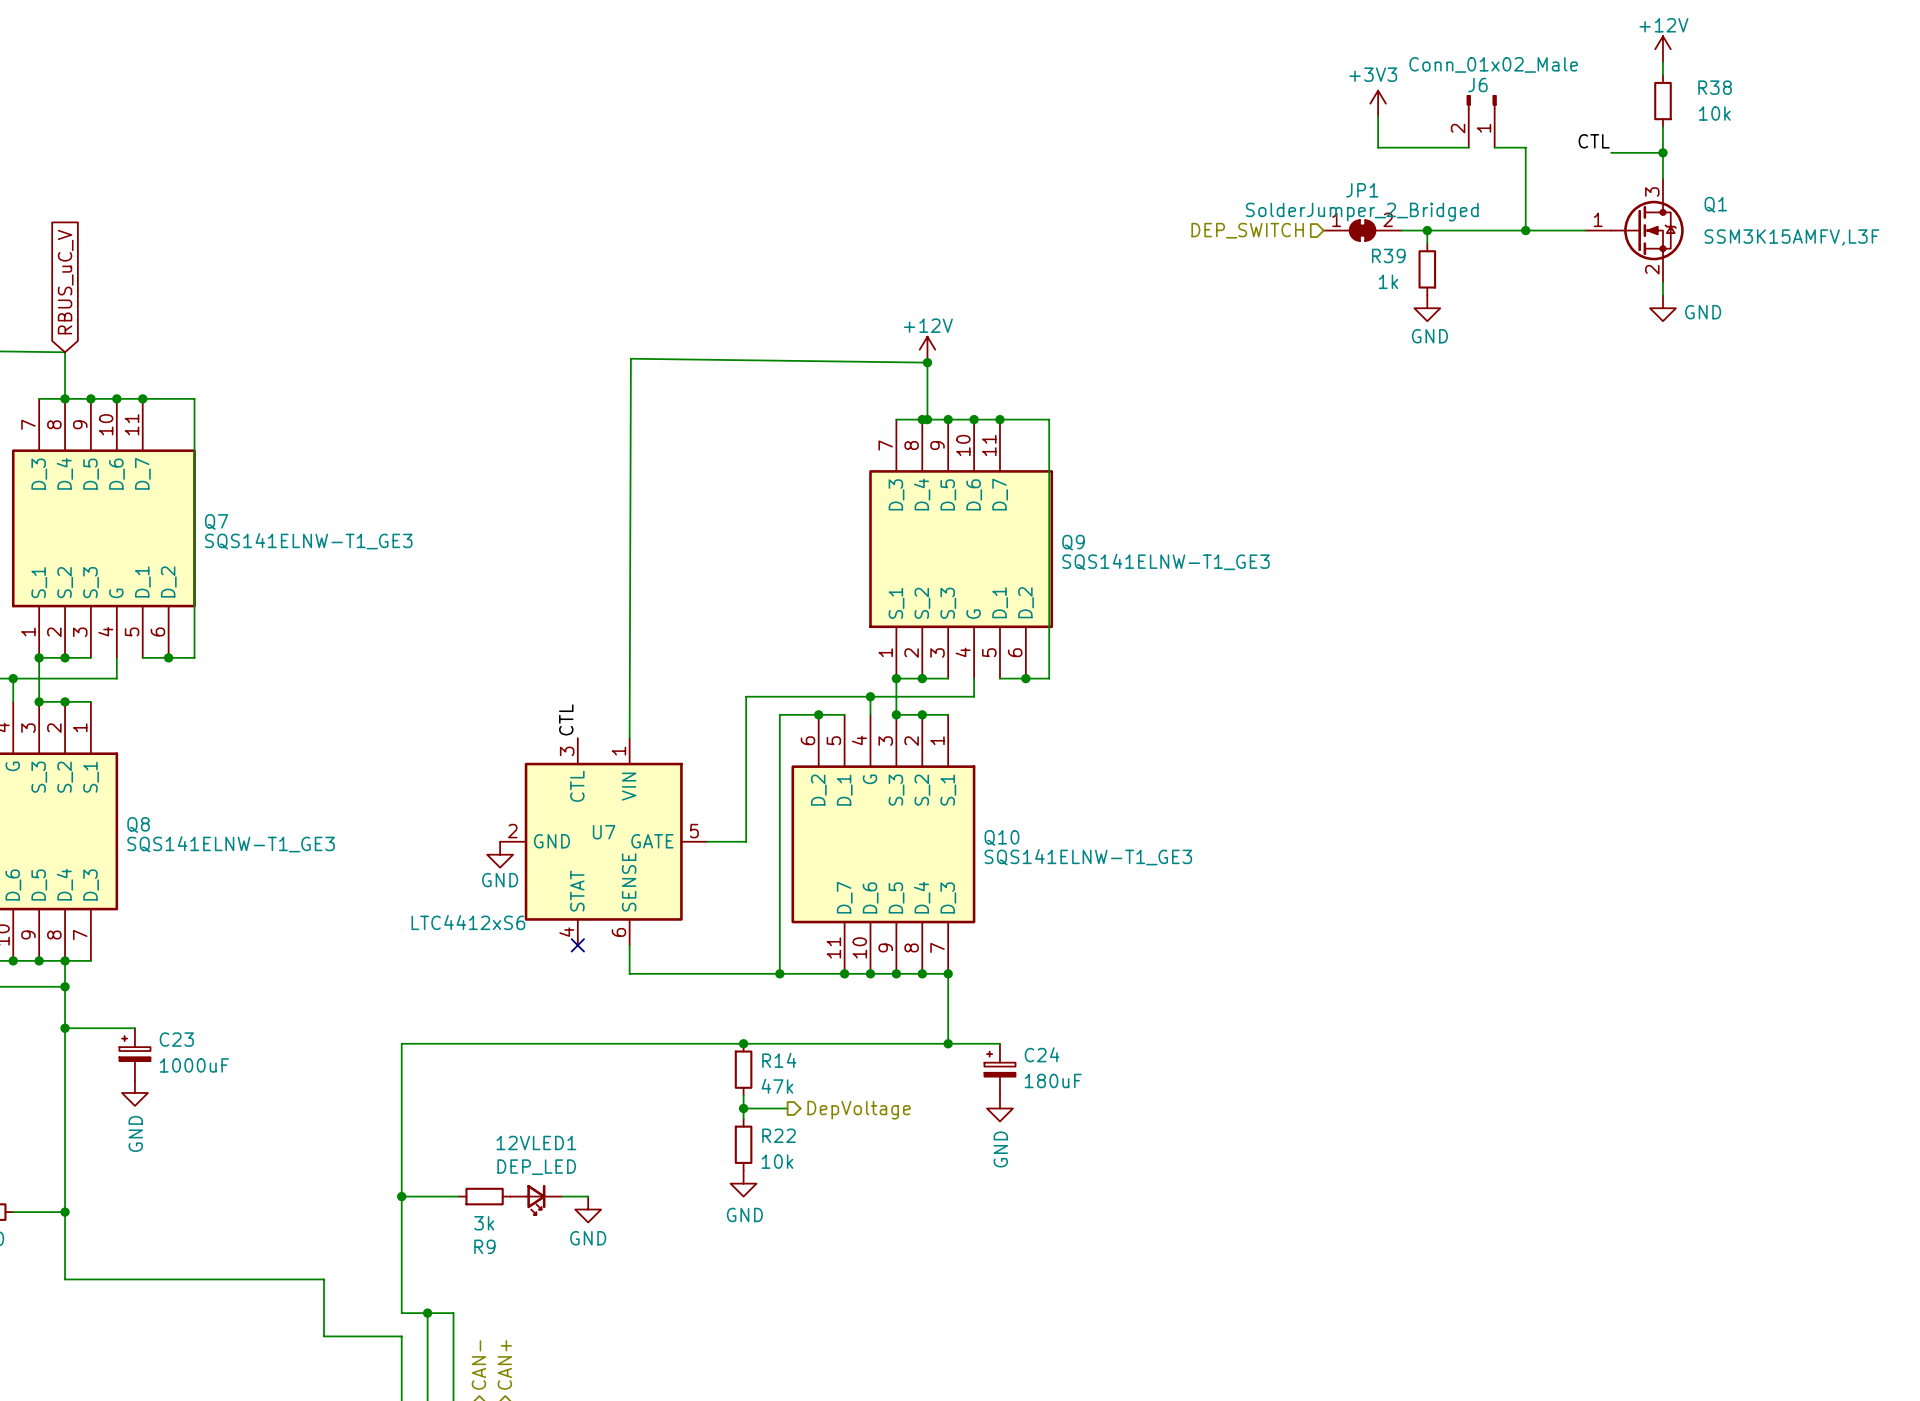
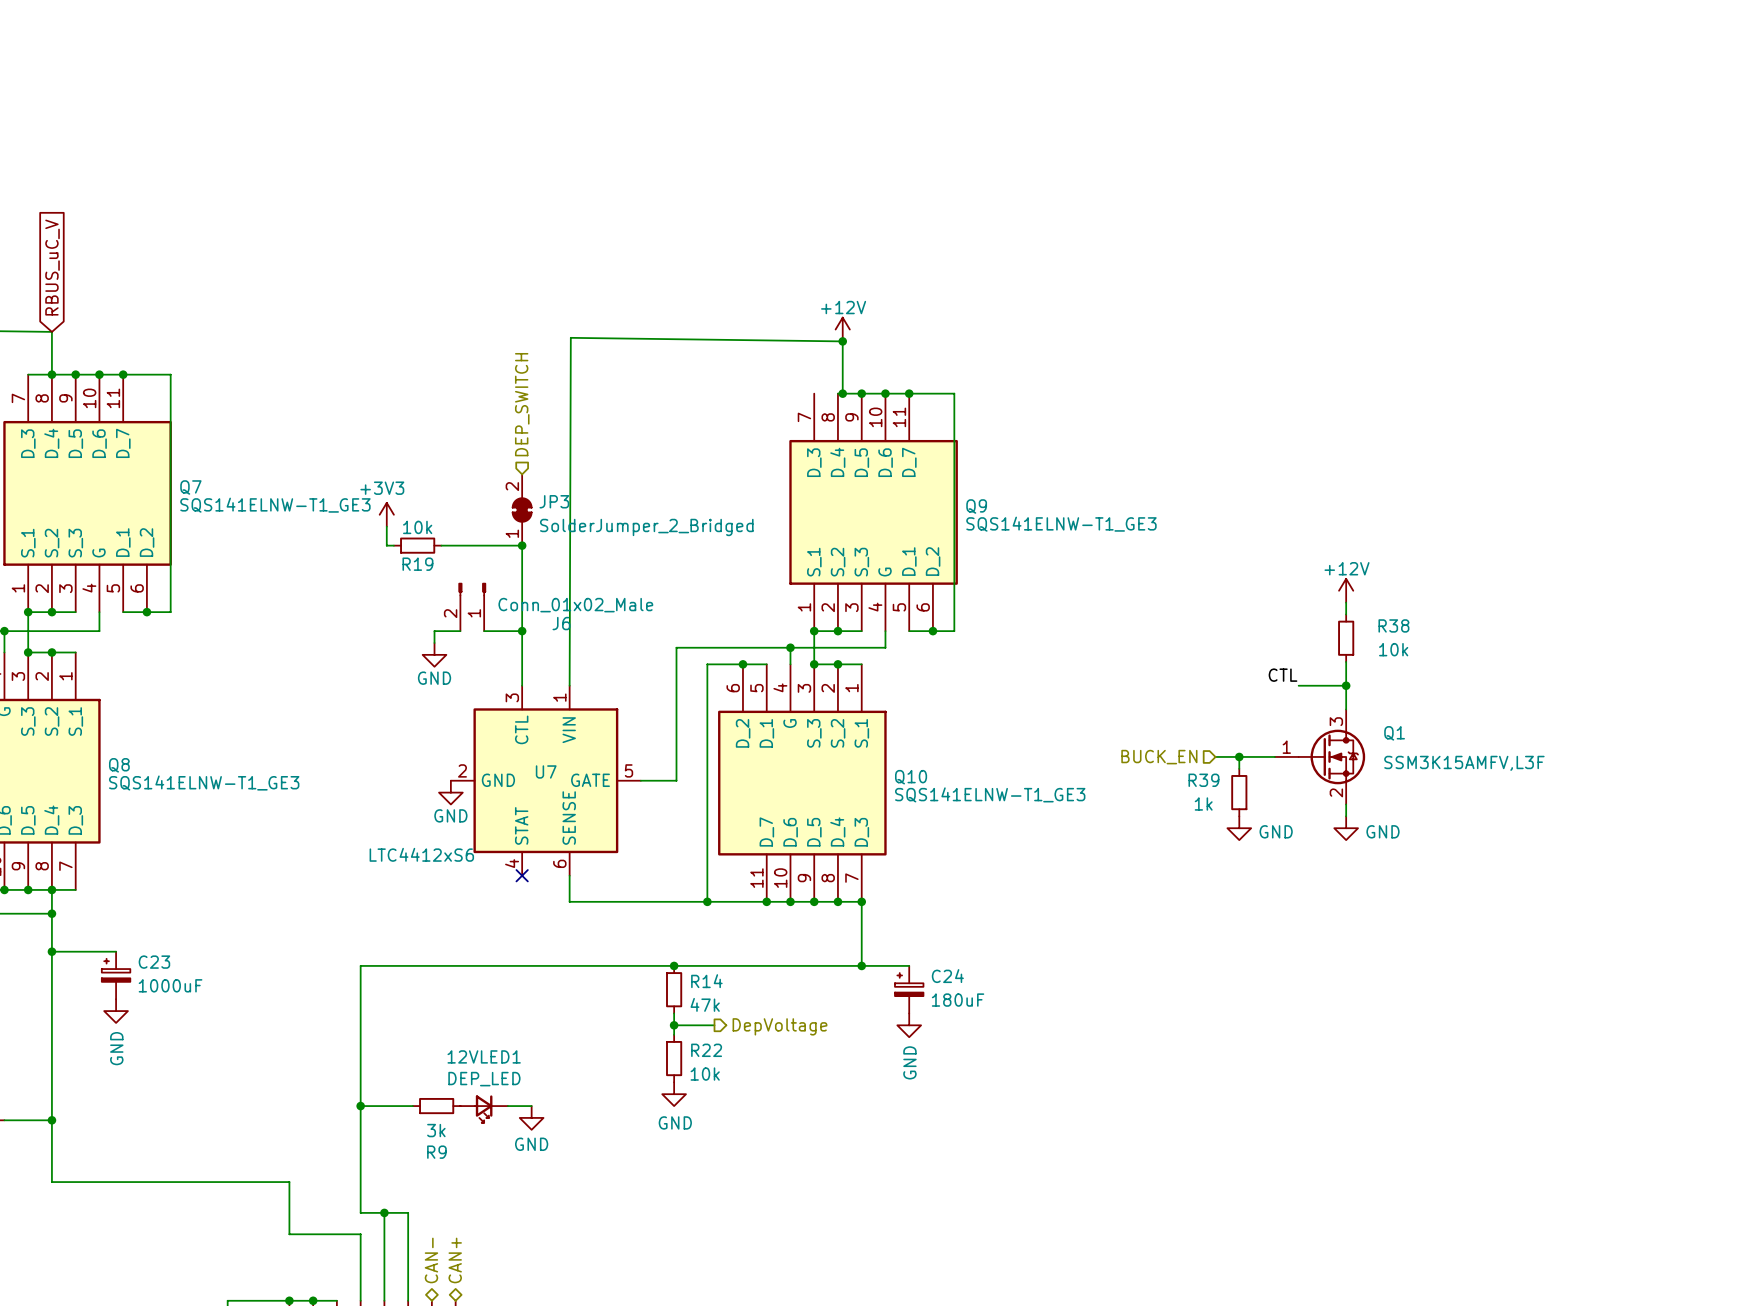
power symbol: +12V (1662, 49) -> none
wire: (1662, 62) (1662, 75) -> none
J6 value position: Conn_01x02_Male (1493, 64) -> Conn_01x02_Male (575, 605)
J6 name position: J6 (1477, 85) -> J6 (561, 623)
R38 position: (1662, 101) -> (1346, 638)
power symbol: +3V3 (1378, 103) -> none
wire: (1378, 116) (1378, 147) (1468, 147) -> none
J6 position: (1481, 121) -> (472, 607)
wire: (1662, 126) (1662, 178) -> none
label: CTL (1594, 141) -> none
wire: (1494, 147) (1525, 147) (1525, 230) -> none
wire: (1611, 152) (1662, 152) -> none
junction: (1662, 152) -> none
hierarchical label: DEP_SWITCH (1247, 230) -> none
JP1: SolderJumper_2_Bridged (1362, 230) -> none
wire: (1401, 230) (1585, 230) -> none
wire: (1427, 230) (1427, 243) -> none
junction: (1427, 230) -> none
junction: (1525, 230) -> none
Q1 position: (1634, 230) -> (1320, 756)
R39 position: (1427, 269) -> (1239, 792)
wire: (1662, 282) (1662, 295) -> none
power symbol: GND (1427, 308) -> none
power symbol: GND (1662, 308) -> none
wire: (896, 419) (922, 419) -> none
junction: (922, 419) -> none
hierarchical label: none -> DEP_SWITCH (522, 404)
JP3: none -> SolderJumper_2_Bridged (522, 510)
power symbol: none -> +3V3 (386, 514)
wire: none -> (386, 526) (386, 545) (393, 545)
R19: none -> 10k (417, 545)
wire: none -> (441, 545) (522, 545) (522, 685)
junction: none -> (522, 545)
power symbol: none -> +12V (1346, 590)
wire: none -> (1346, 602) (1346, 614)
wire: none -> (460, 631) (434, 631) (434, 642)
wire: none -> (484, 631) (522, 631)
junction: none -> (522, 631)
power symbol: none -> GND (434, 654)
wire: none -> (1346, 661) (1346, 709)
label: CTL (566, 719) -> none
label: none -> CTL (1283, 675)
wire: none -> (1298, 685) (1346, 685)
junction: none -> (1346, 685)
hierarchical label: none -> BUCK_EN (1159, 757)
wire: none -> (1215, 756) (1274, 756)
wire: none -> (1239, 756) (1239, 768)
junction: none -> (1239, 756)
wire: none -> (1346, 804) (1346, 816)
power symbol: none -> GND (1239, 828)
power symbol: none -> GND (1346, 828)

